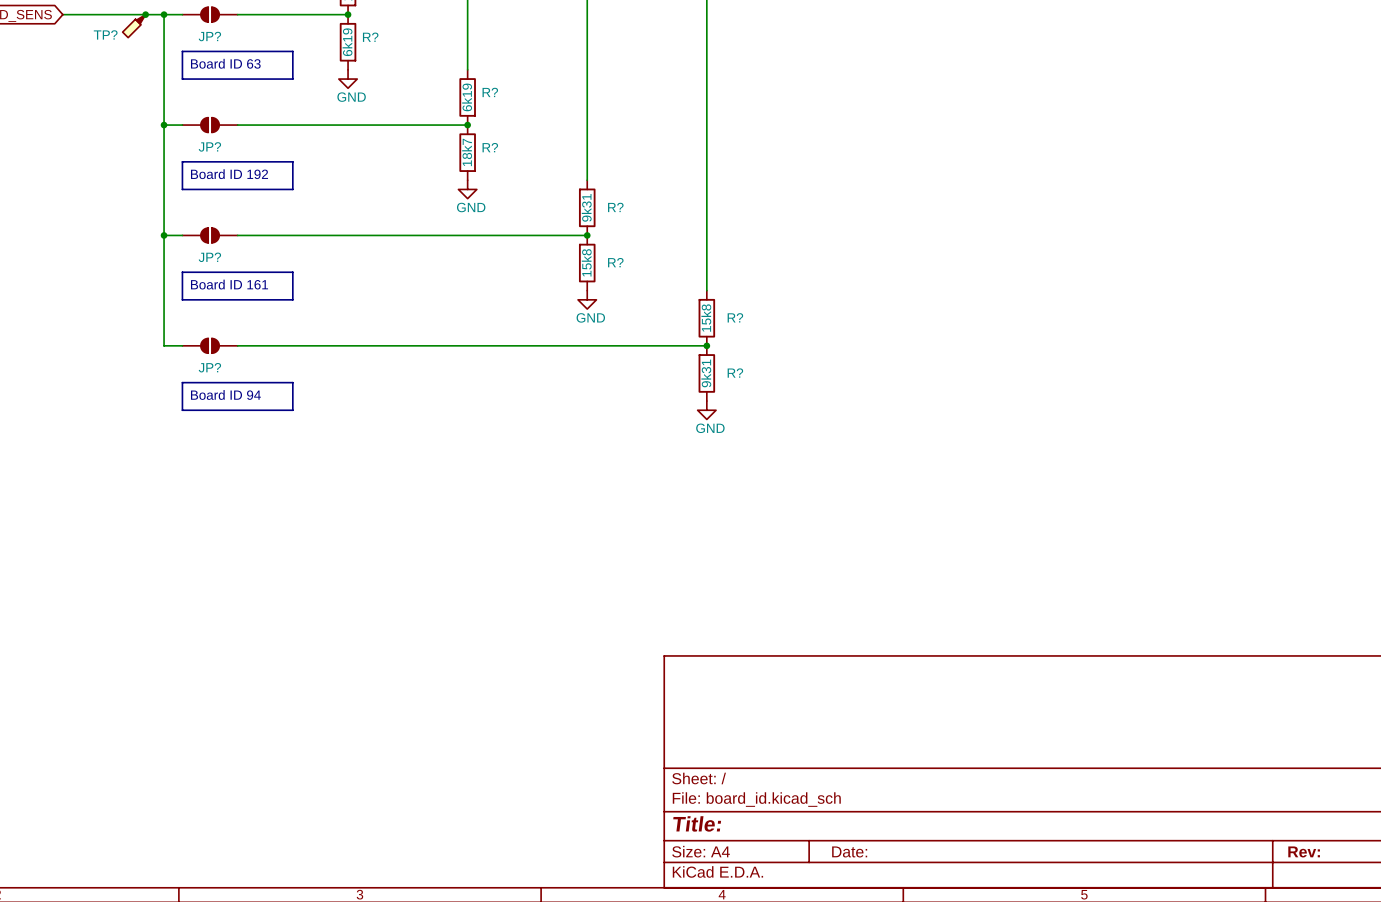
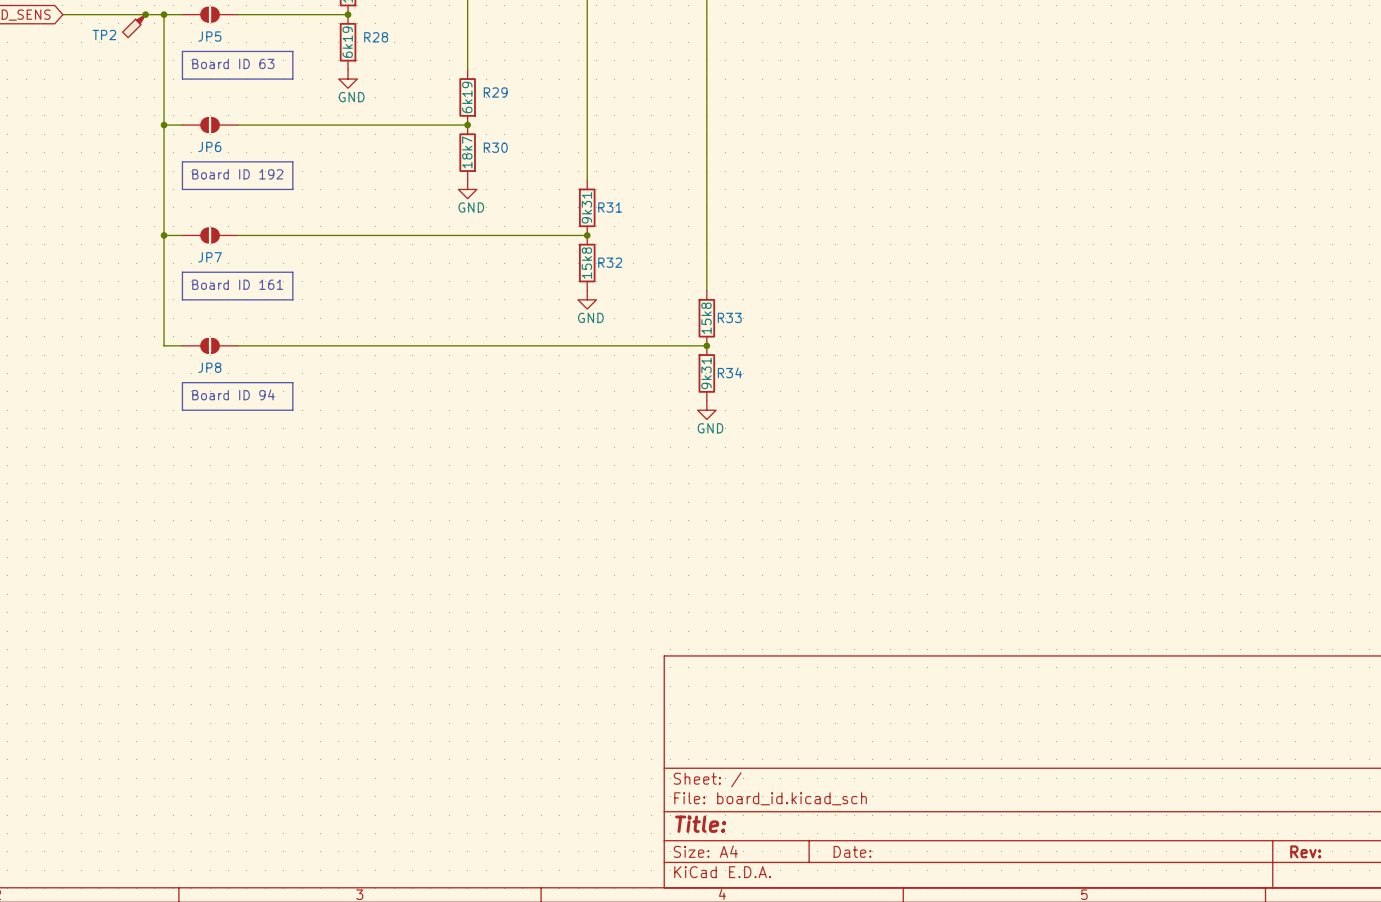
TP? name: TP? (105, 34) -> TP2 (104, 35)
JP? name: JP? (209, 36) -> JP5 (209, 36)
R? name: R? (370, 37) -> R28 (376, 37)
R? name: R? (490, 92) -> R29 (495, 92)
JP? name: JP? (209, 146) -> JP6 (209, 146)
R? name: R? (490, 147) -> R30 (495, 147)
R? name: R? (615, 207) -> R31 (610, 207)
JP? name: JP? (209, 257) -> JP7 (210, 257)
R? name: R? (615, 262) -> R32 (610, 262)
R? name: R? (735, 317) -> R33 (729, 317)
JP? name: JP? (209, 367) -> JP8 (209, 367)
R? name: R? (735, 373) -> R34 (729, 372)

